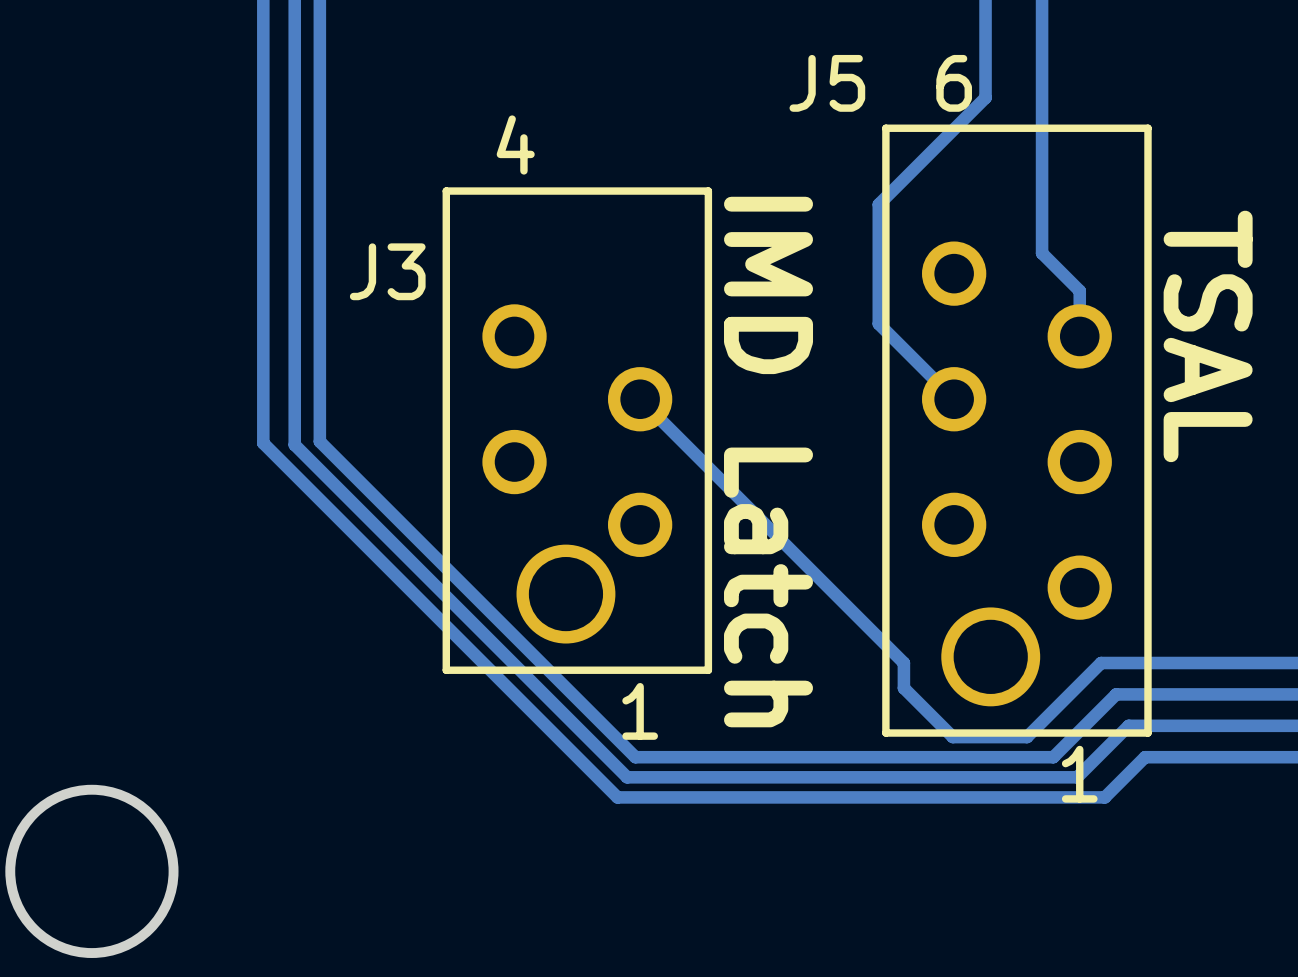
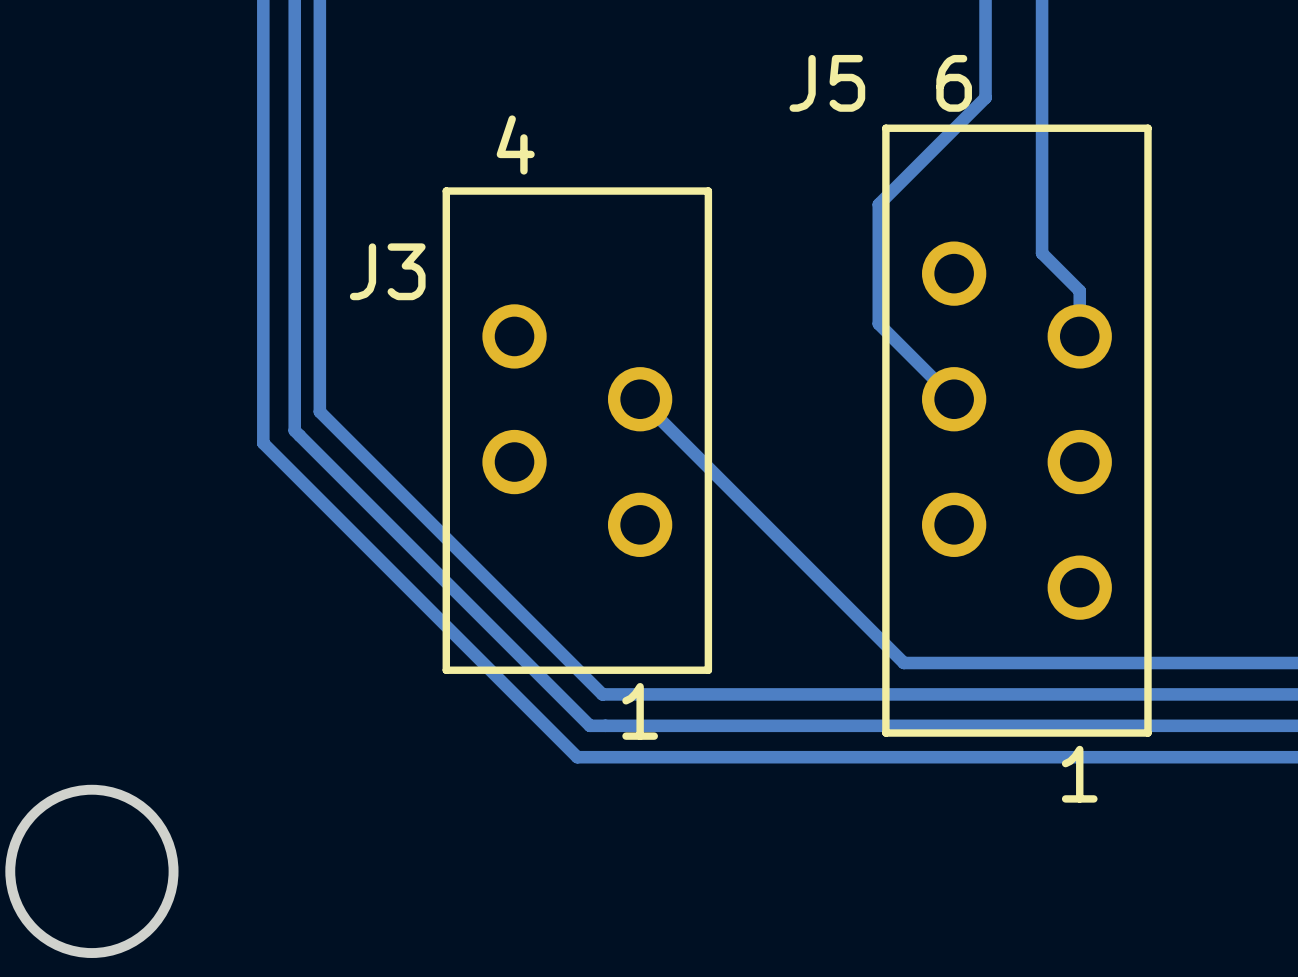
J5 footprint: [882, 124, 1152, 737] -> [882, 124, 1152, 737]
J3 footprint: [442, 187, 713, 674] -> [442, 187, 713, 674]
text: TSAL (1208, 336) -> none
track: (319, 411) (319, 441) (635, 757) -> (577, 757) (635, 757)
track: none -> (319, 411) (602, 694) (1116, 694)
track: (294, 430) (294, 444) (627, 777) (1077, 777) (1128, 725) -> (294, 430) (589, 725) (1128, 725)
text: IMD Latch (768, 462) -> none
track: (1101, 663) (1026, 737) (952, 737) (903, 688) (903, 663) -> (1101, 663) (903, 663)
track: (1116, 694) (1053, 757) -> (1145, 757) (1053, 757)
track: (1145, 757) (1104, 797) (617, 797) (577, 757) -> none

